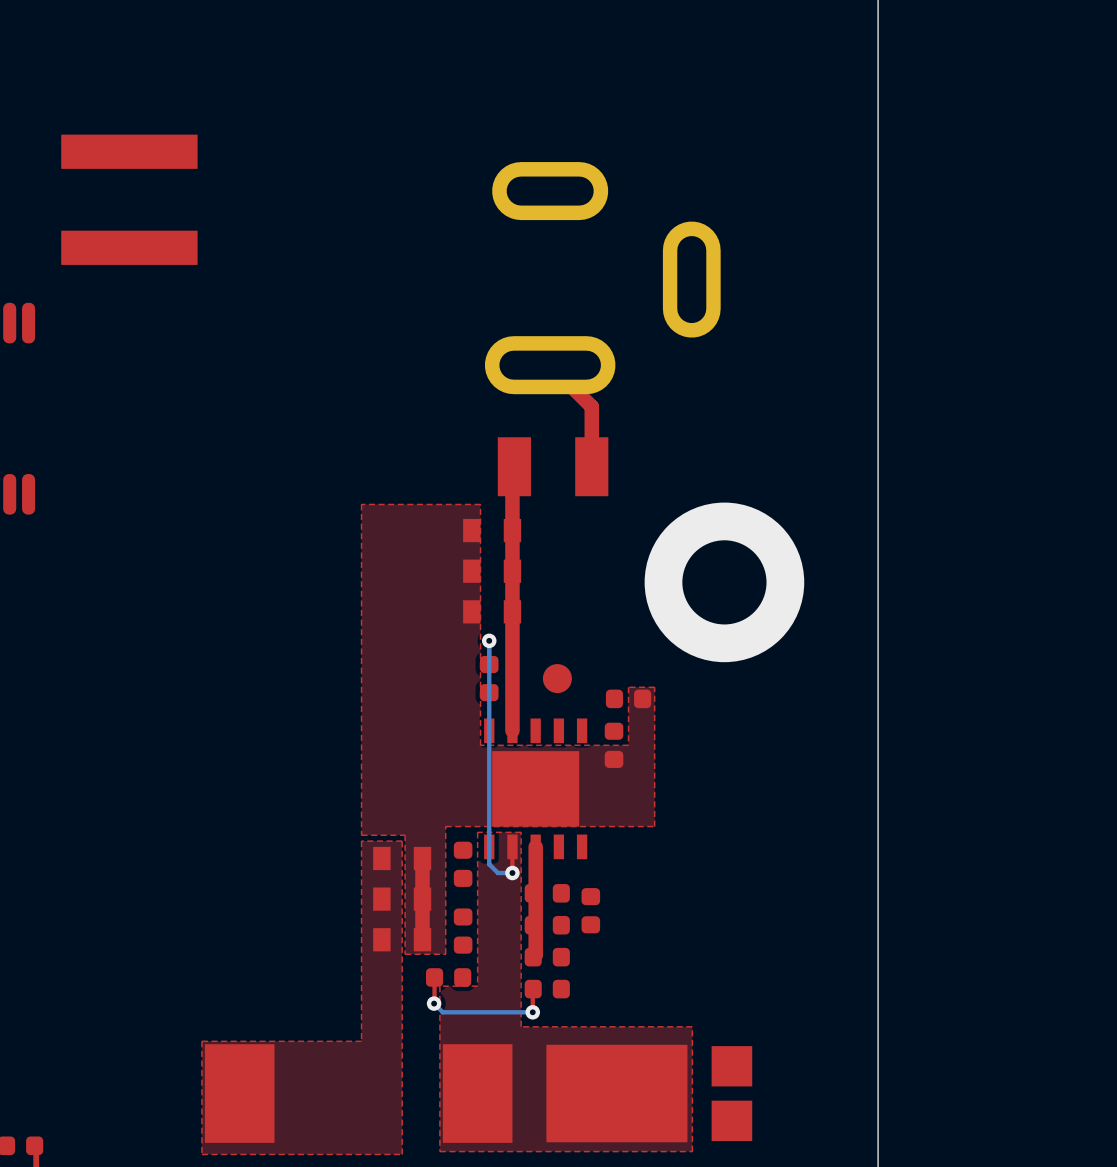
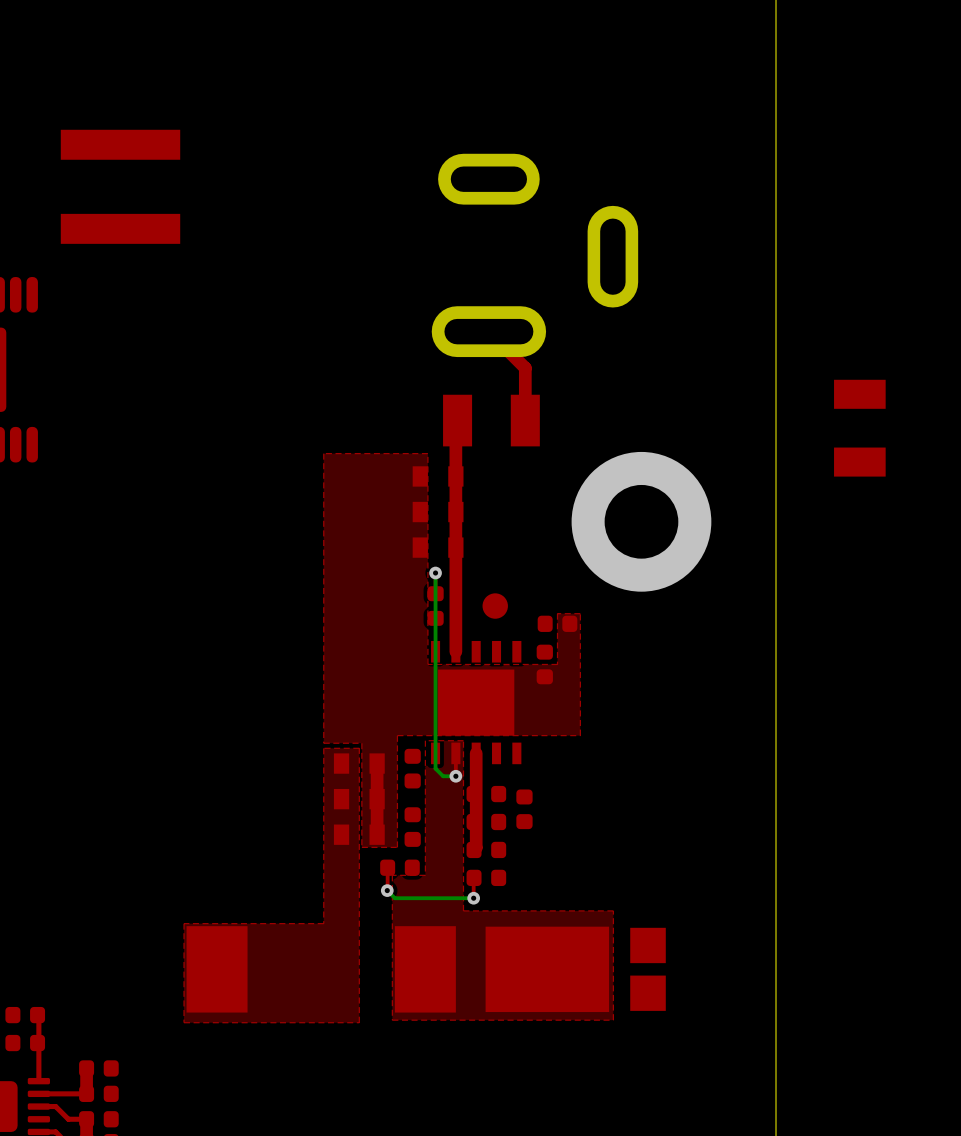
part: none -> (859, 428)

